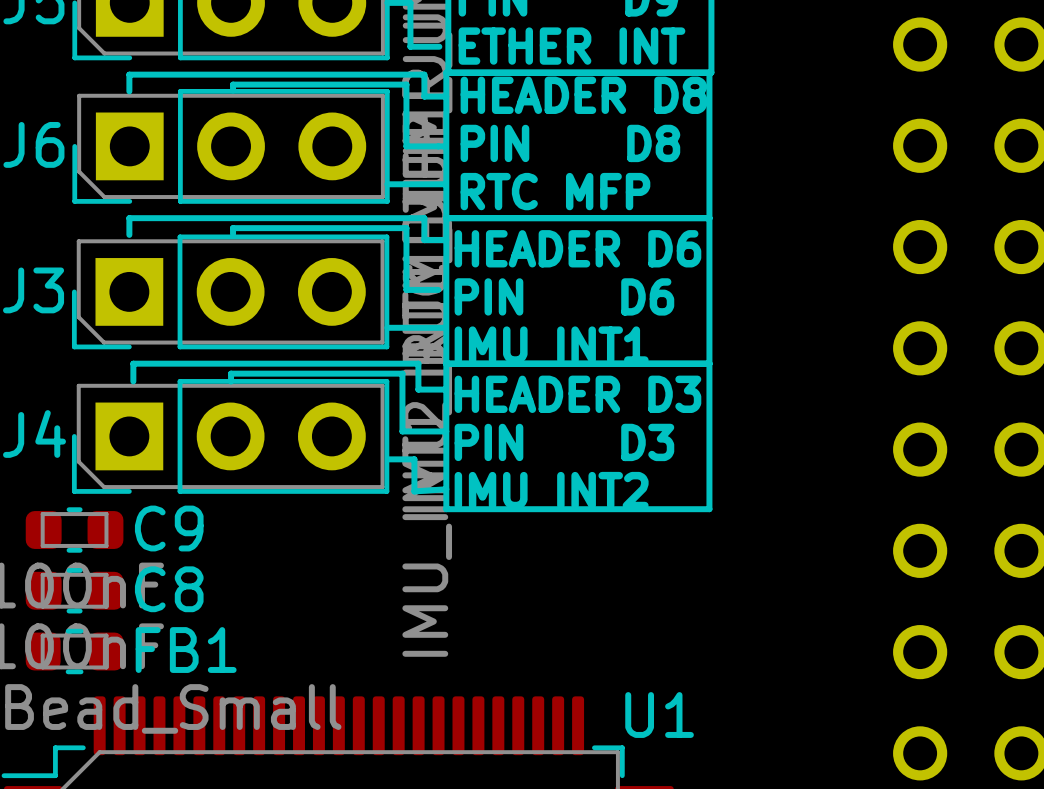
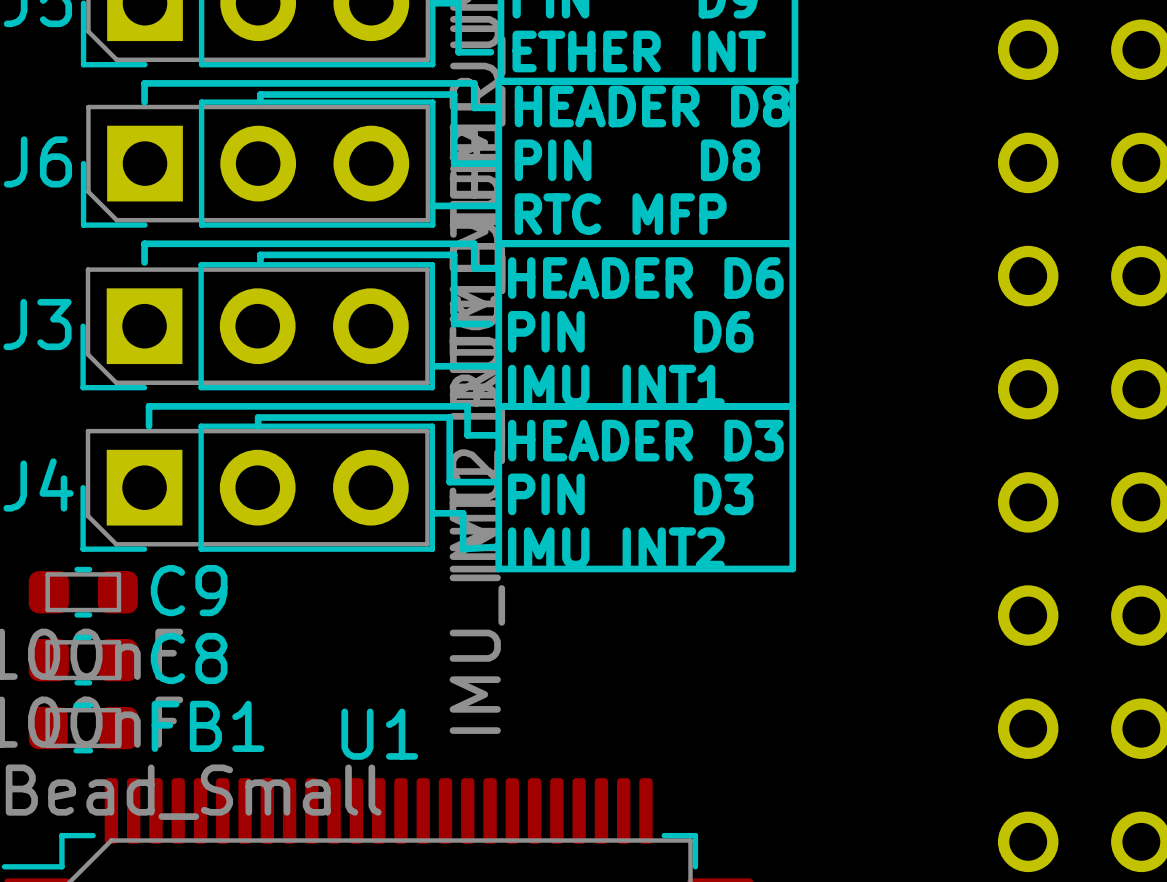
U1 name position: U1 (659, 715) -> U1 (379, 734)

